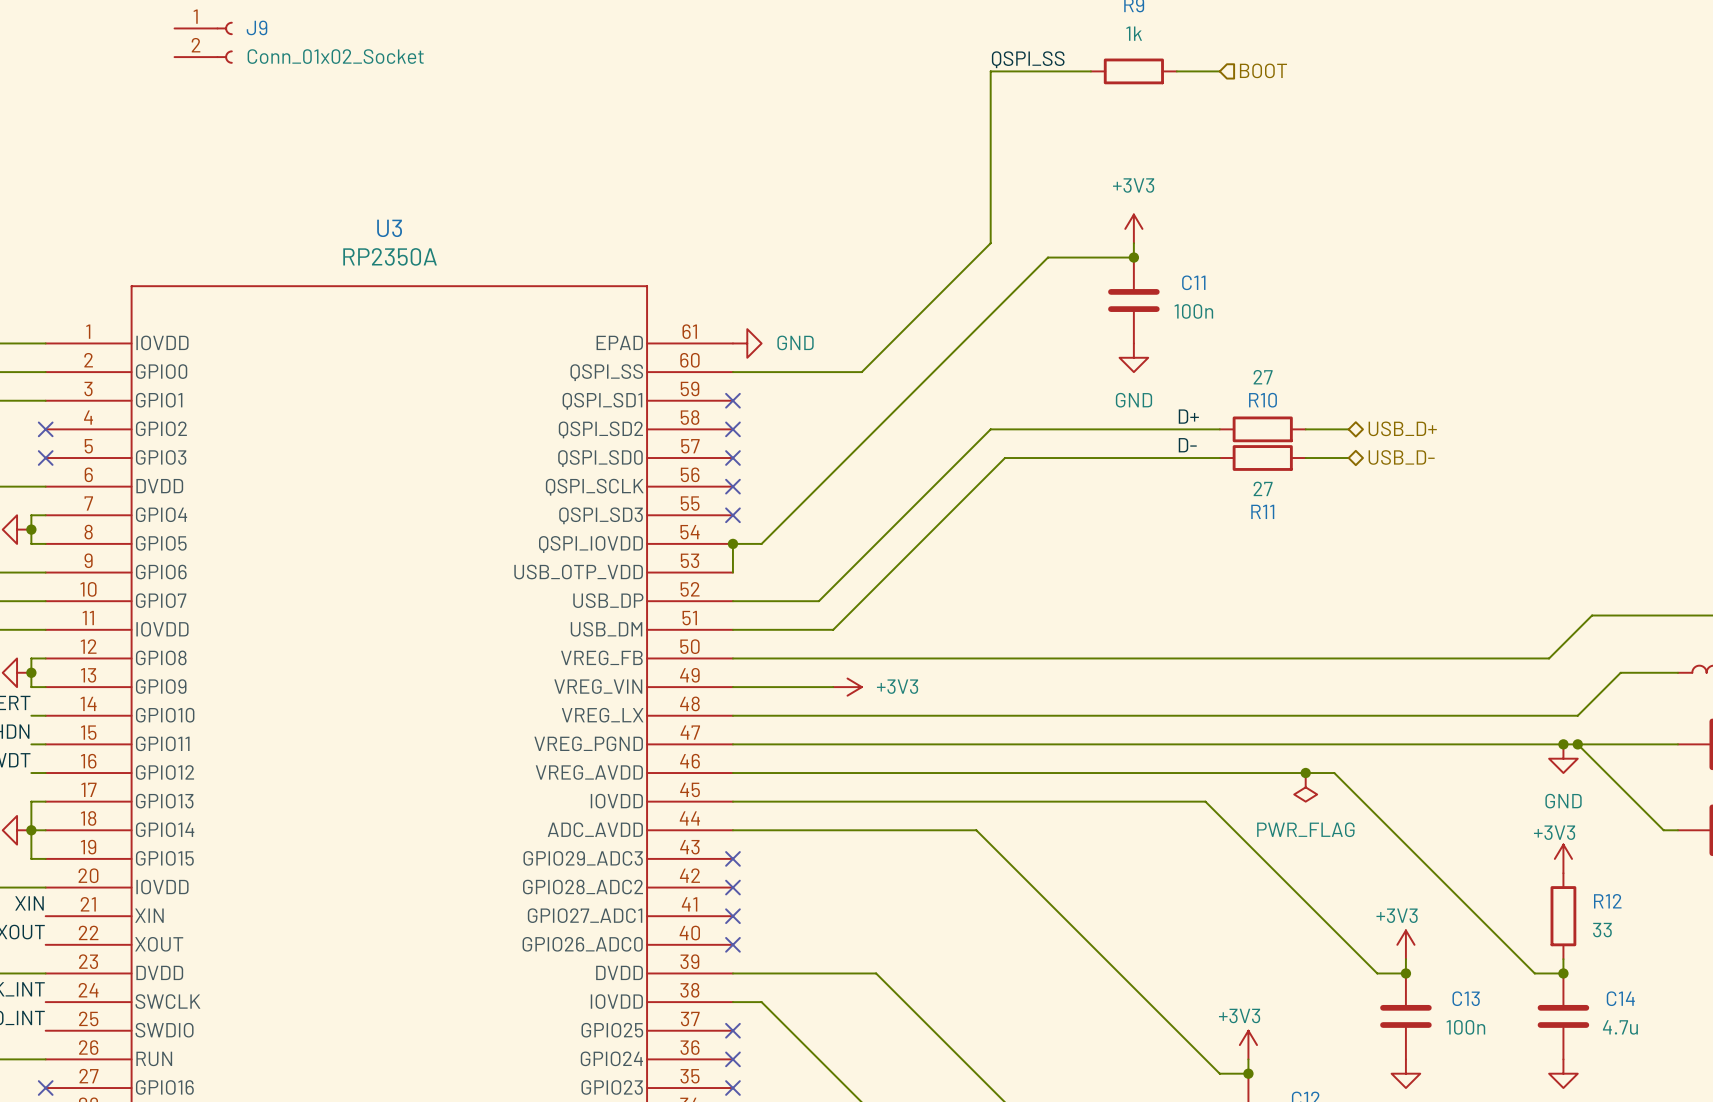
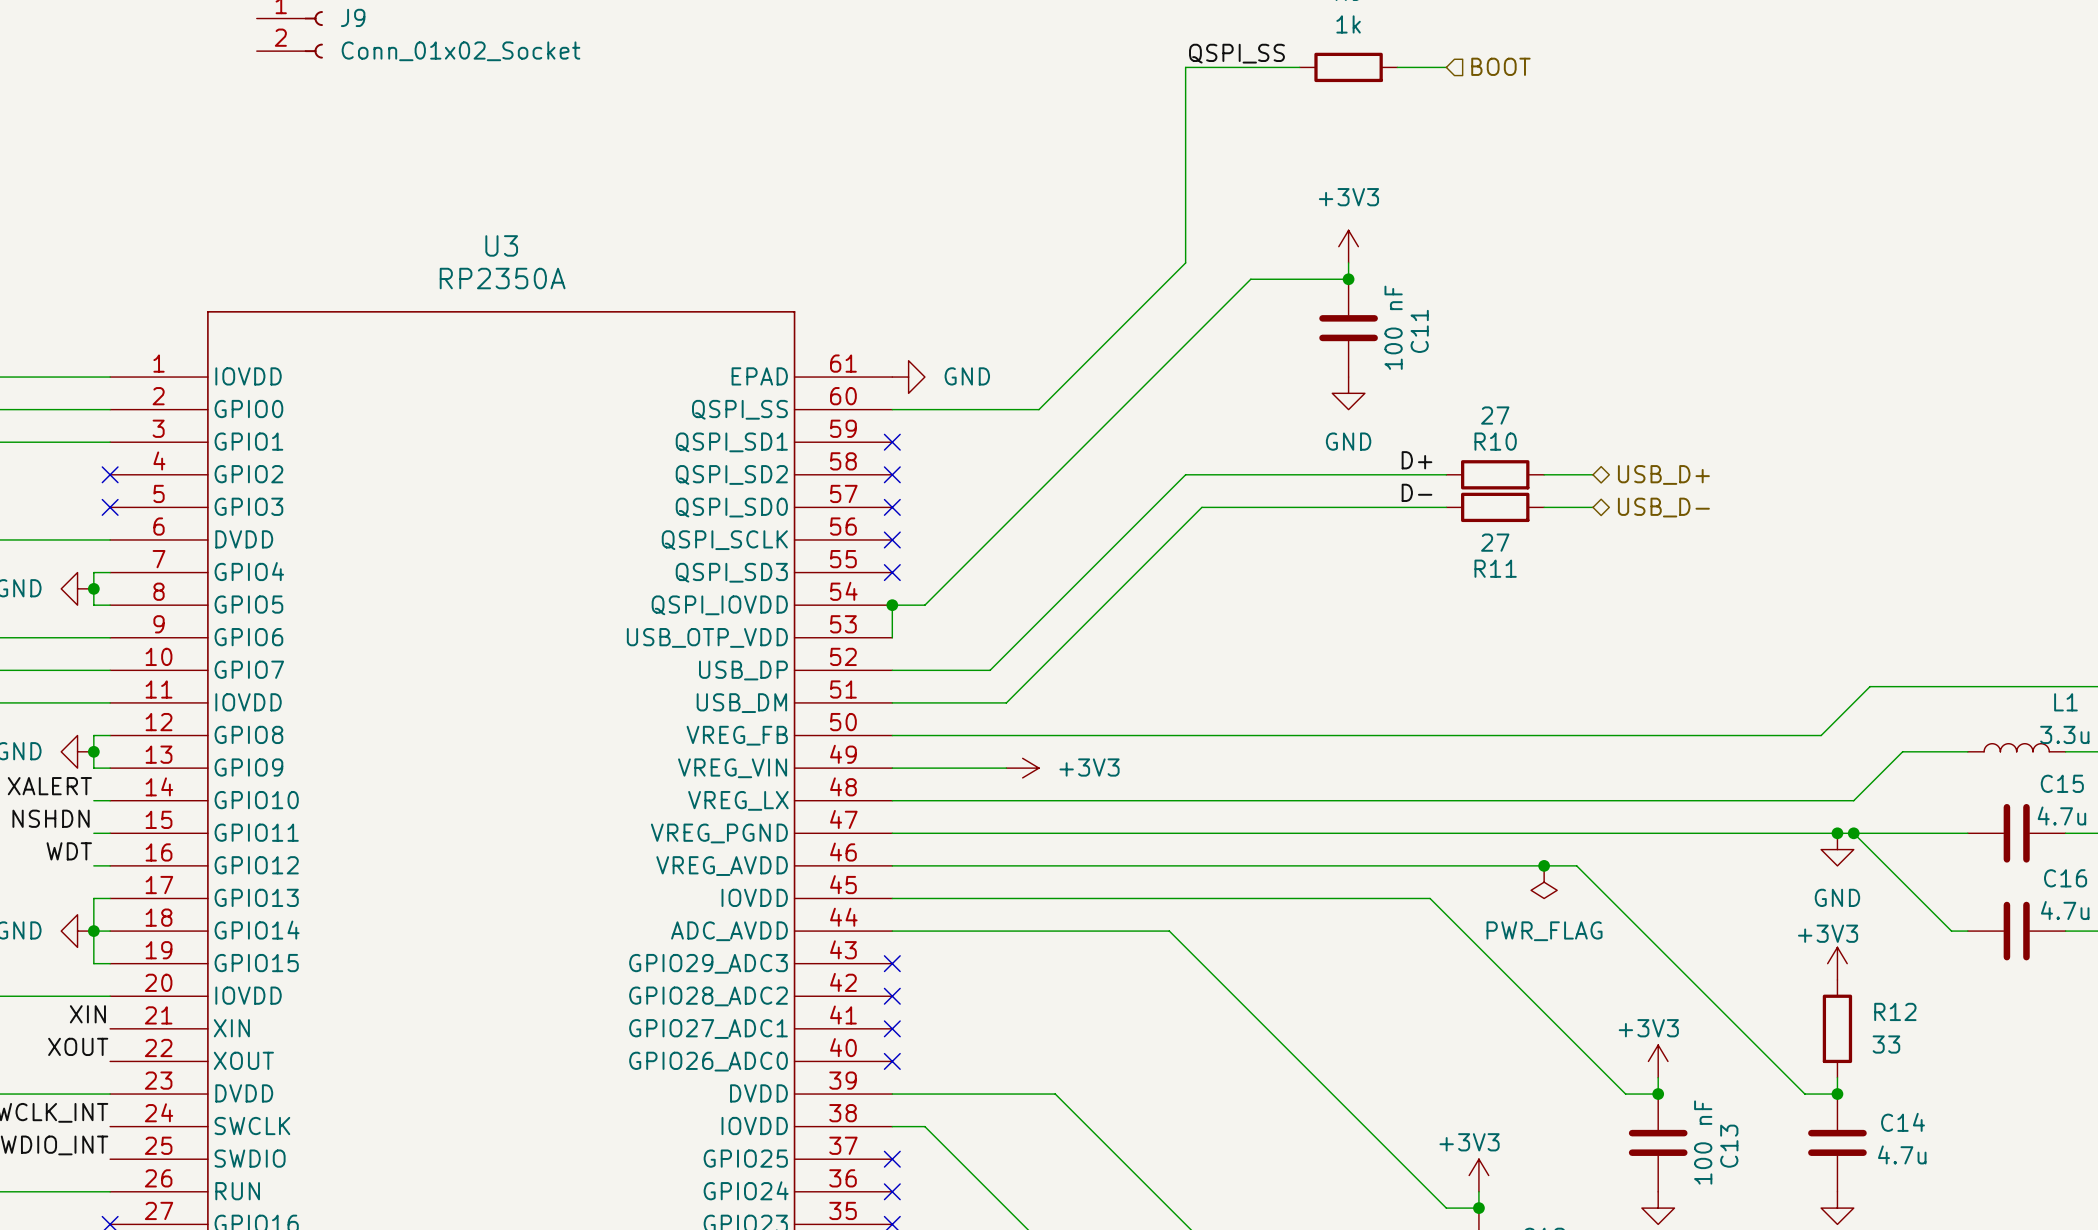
C11 name rotation: 0° (1193, 282) -> 90° counterclockwise (1419, 331)
C11 value: 100n (1193, 311) -> 100 nF (1393, 327)
C13 name rotation: 0° (1466, 998) -> 90° counterclockwise (1729, 1146)
C13 value: 100n (1465, 1027) -> 100 nF (1703, 1142)

